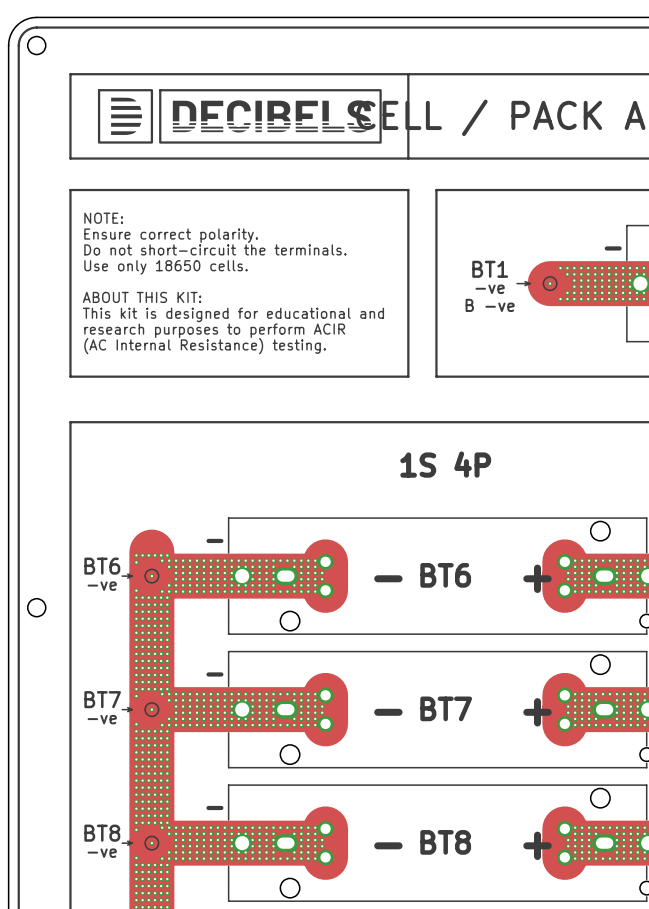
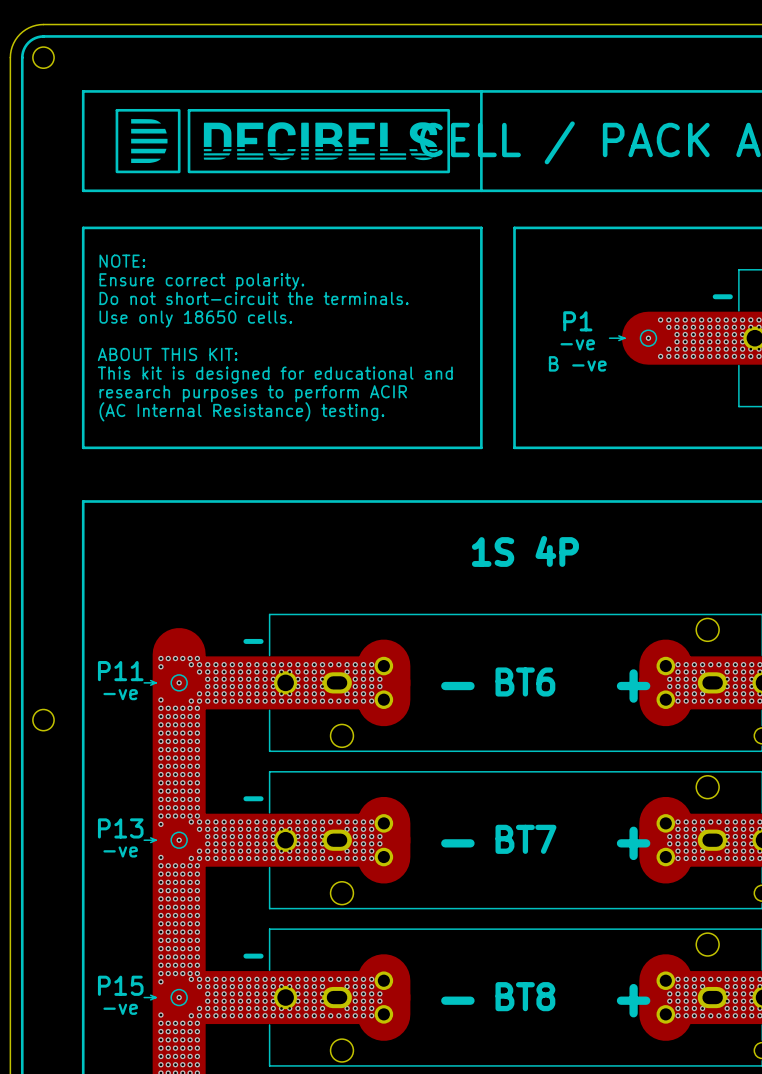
text: BT1 (490, 269) -> P1 (577, 321)
text: BT6 (102, 566) -> P11 (120, 671)
text: BT7 (102, 699) -> P13 (120, 828)
text: BT8 (102, 833) -> P15 (120, 985)

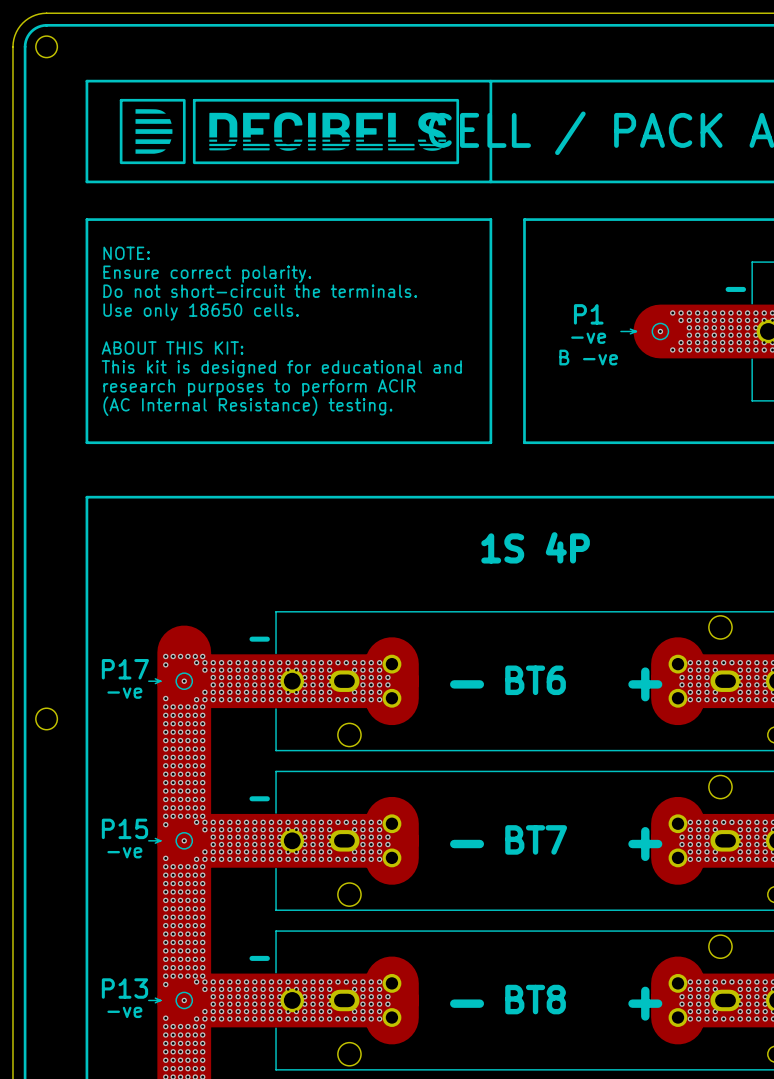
text: P11 (120, 671) -> P17 (125, 669)
text: P13 (120, 828) -> P15 (124, 828)
text: P15 (120, 985) -> P13 (124, 988)

